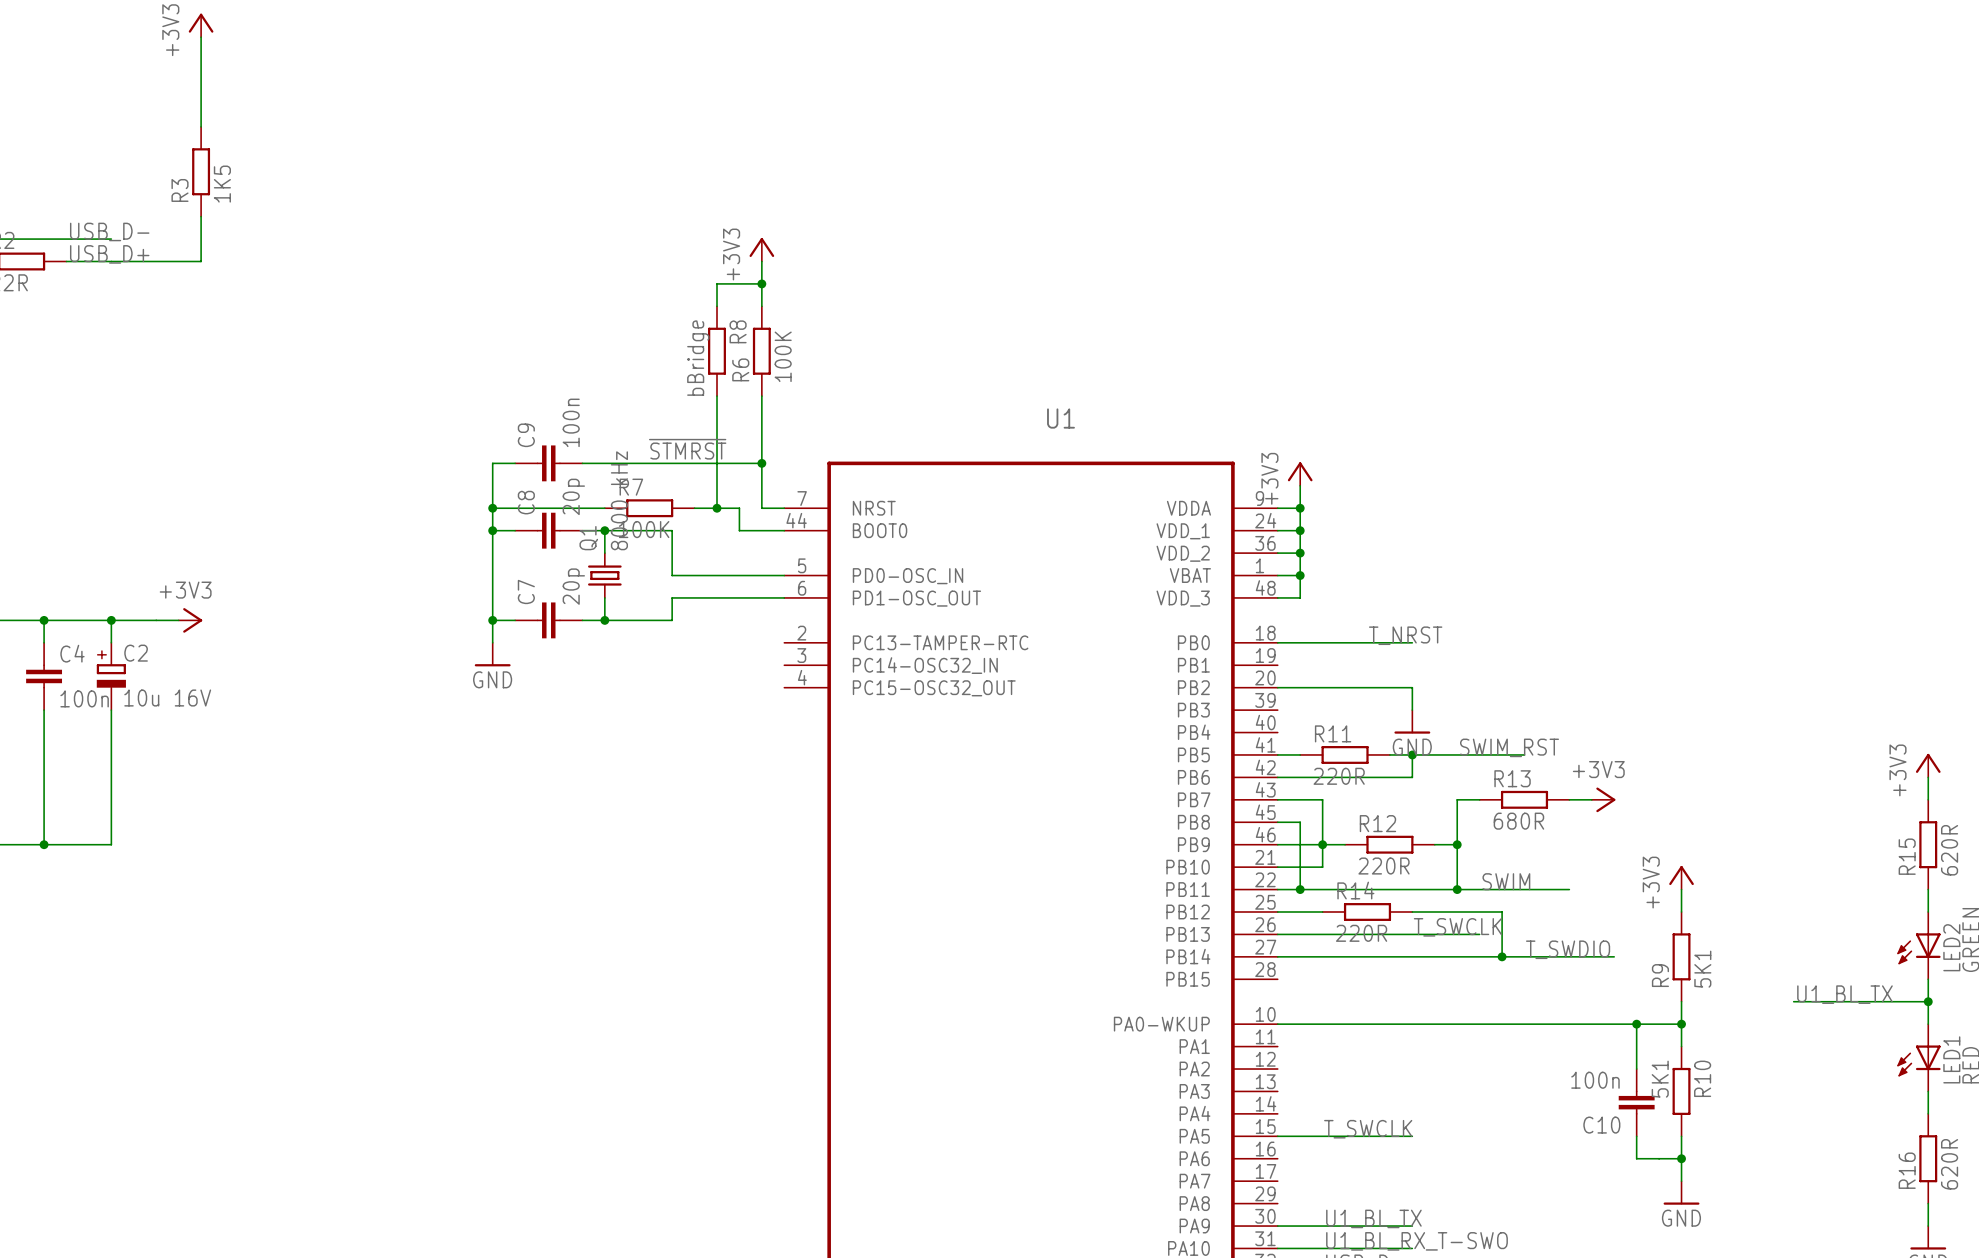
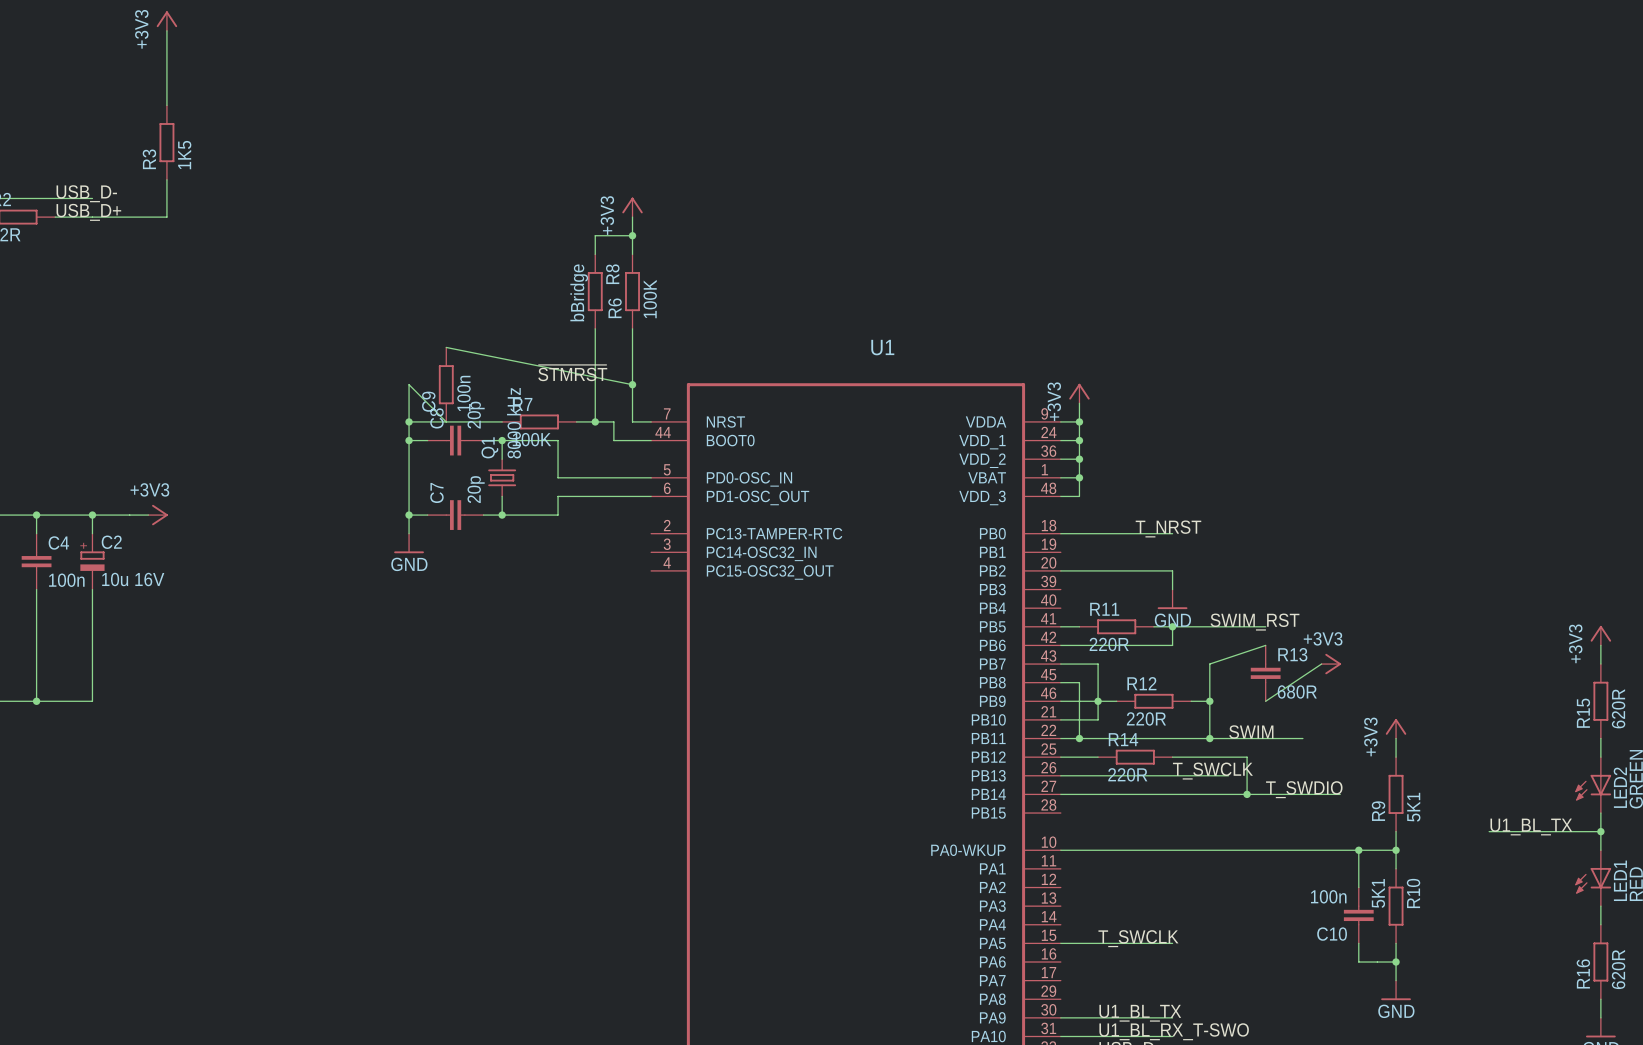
C9 value position: 100n (571, 422) -> 100n (463, 393)
C9 name position: C9 (526, 435) -> C9 (428, 401)
C9 symbol: [515, 445, 583, 482] -> [438, 347, 454, 422]
wire: (492, 463) (515, 463) -> (409, 384) (446, 421)
wire: (582, 463) (761, 463) -> (446, 347) (632, 384)
R13 name position: R13 (1512, 778) -> R13 (1292, 654)
R13 symbol: [1479, 790, 1570, 809] -> [1250, 645, 1281, 702]
wire: (1457, 799) (1479, 799) -> (1209, 664) (1265, 645)
wire: (1569, 799) (1591, 799) -> (1265, 701) (1321, 664)
R13 value position: 680R (1518, 821) -> 680R (1297, 691)

